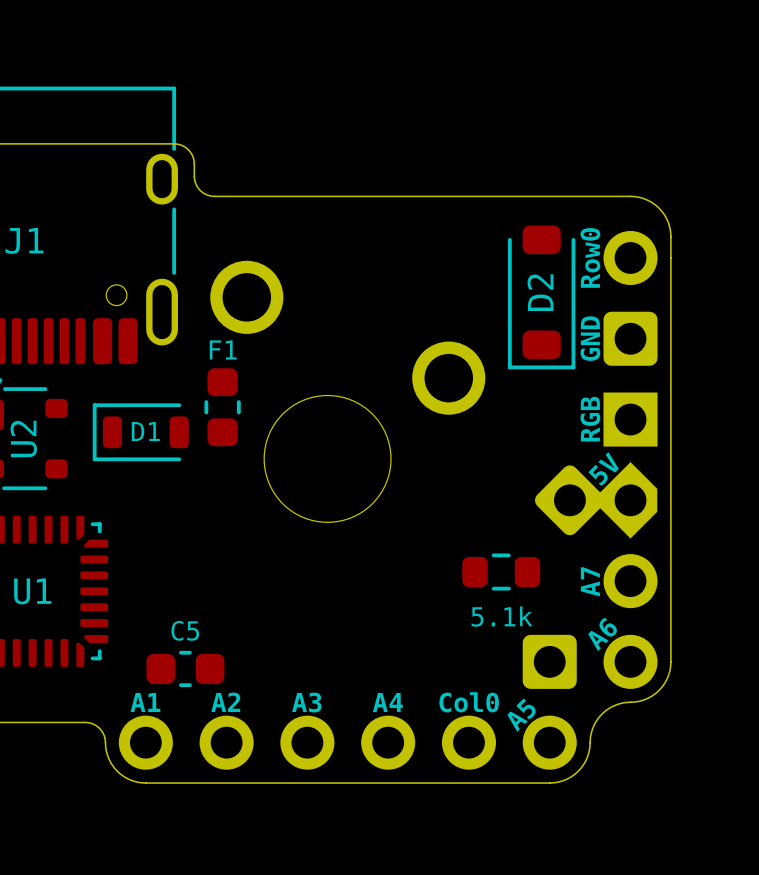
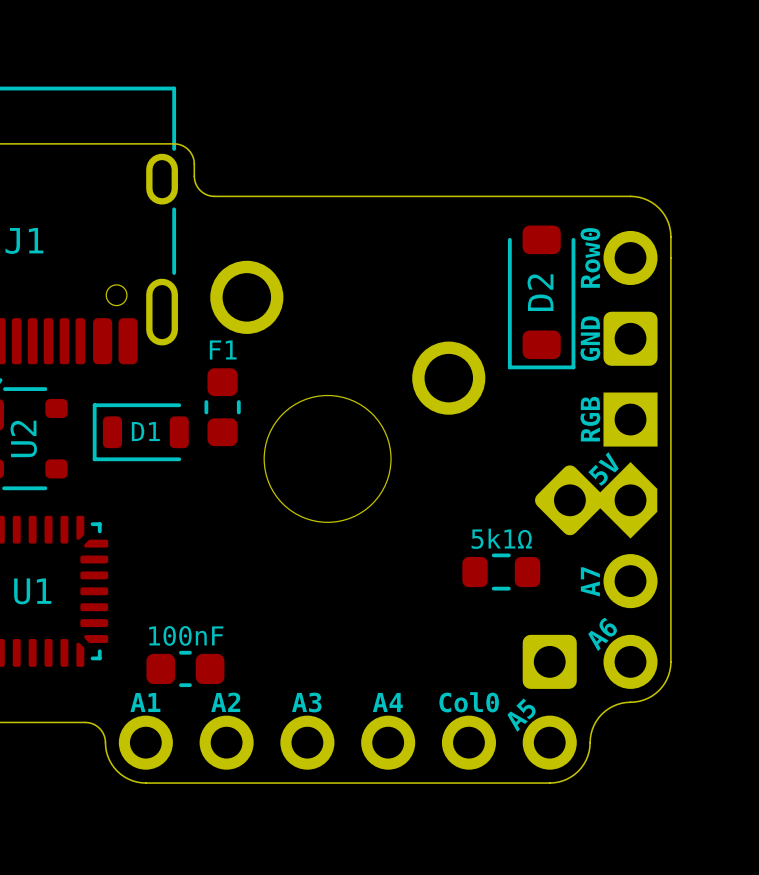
part value: 5.1k (501, 616) -> 5k1Ω (501, 538)
C5 name: C5 (185, 630) -> none
C5 value: none -> 100nF (186, 635)

